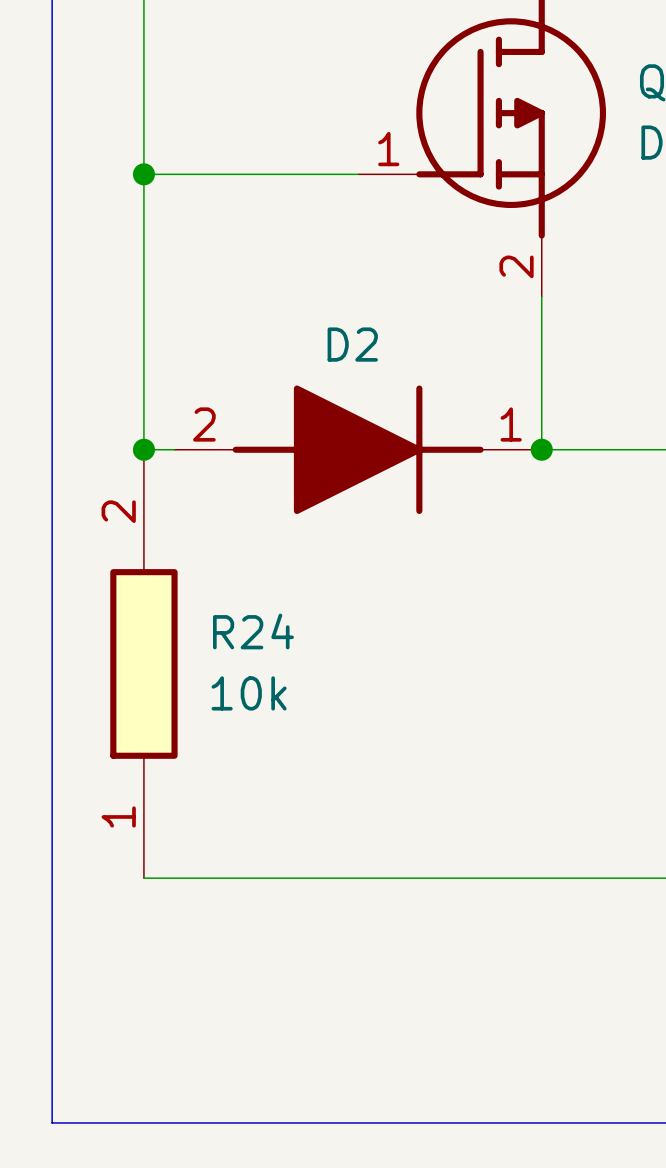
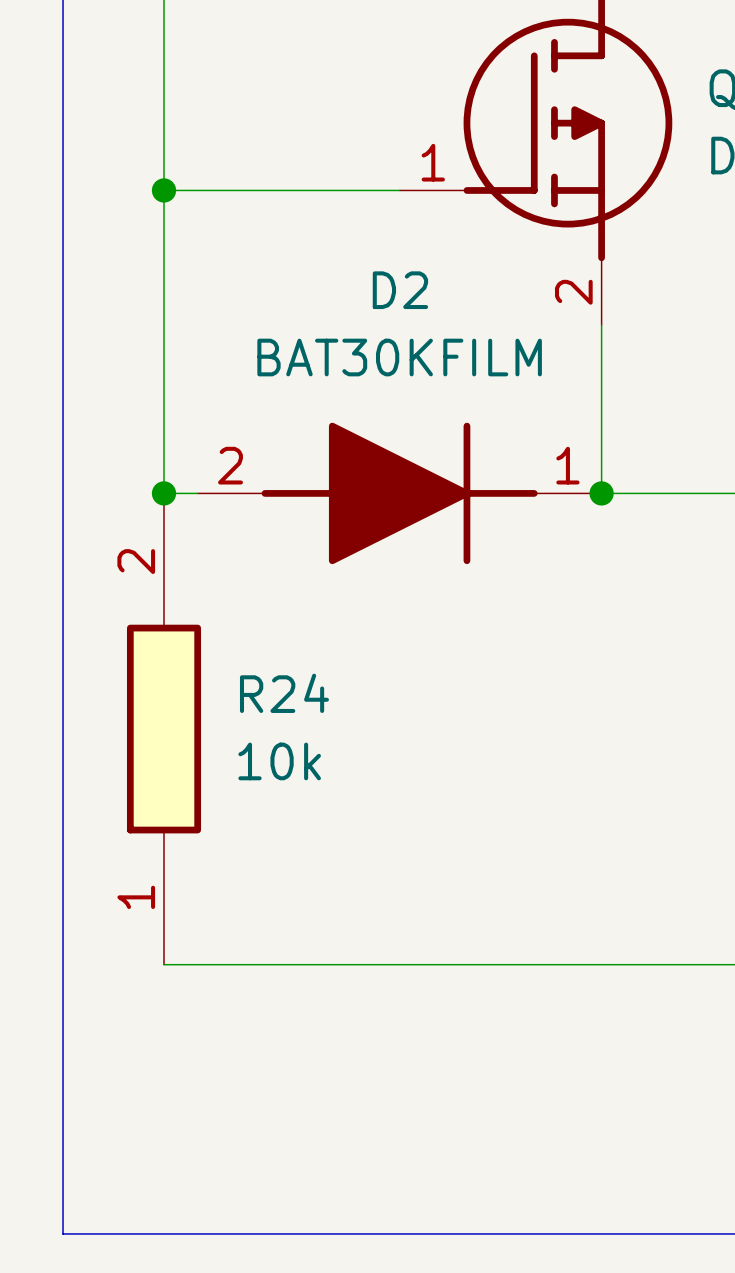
D2 value: none -> BAT30KFILM (399, 357)
D2 name position: D2 (352, 344) -> D2 (400, 290)

